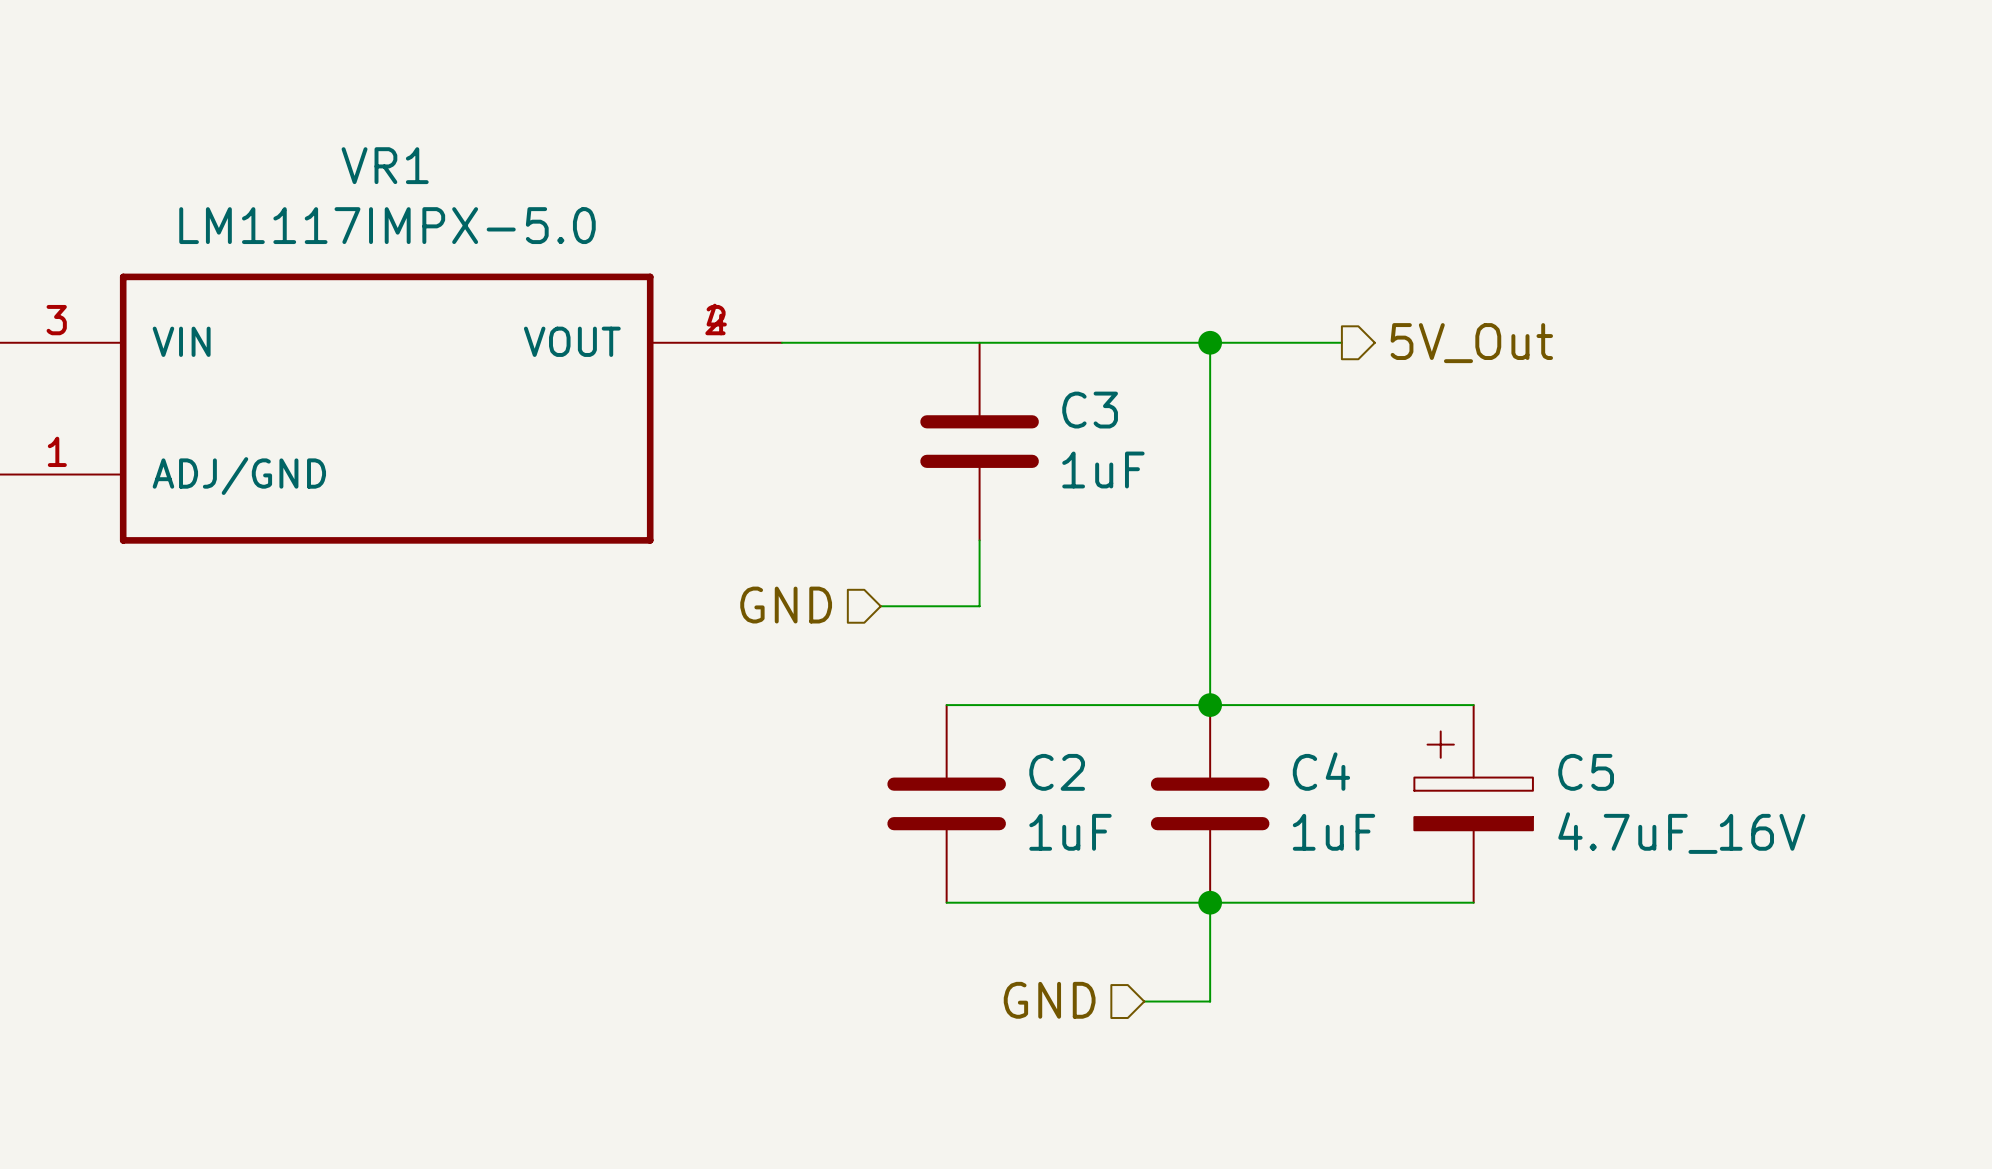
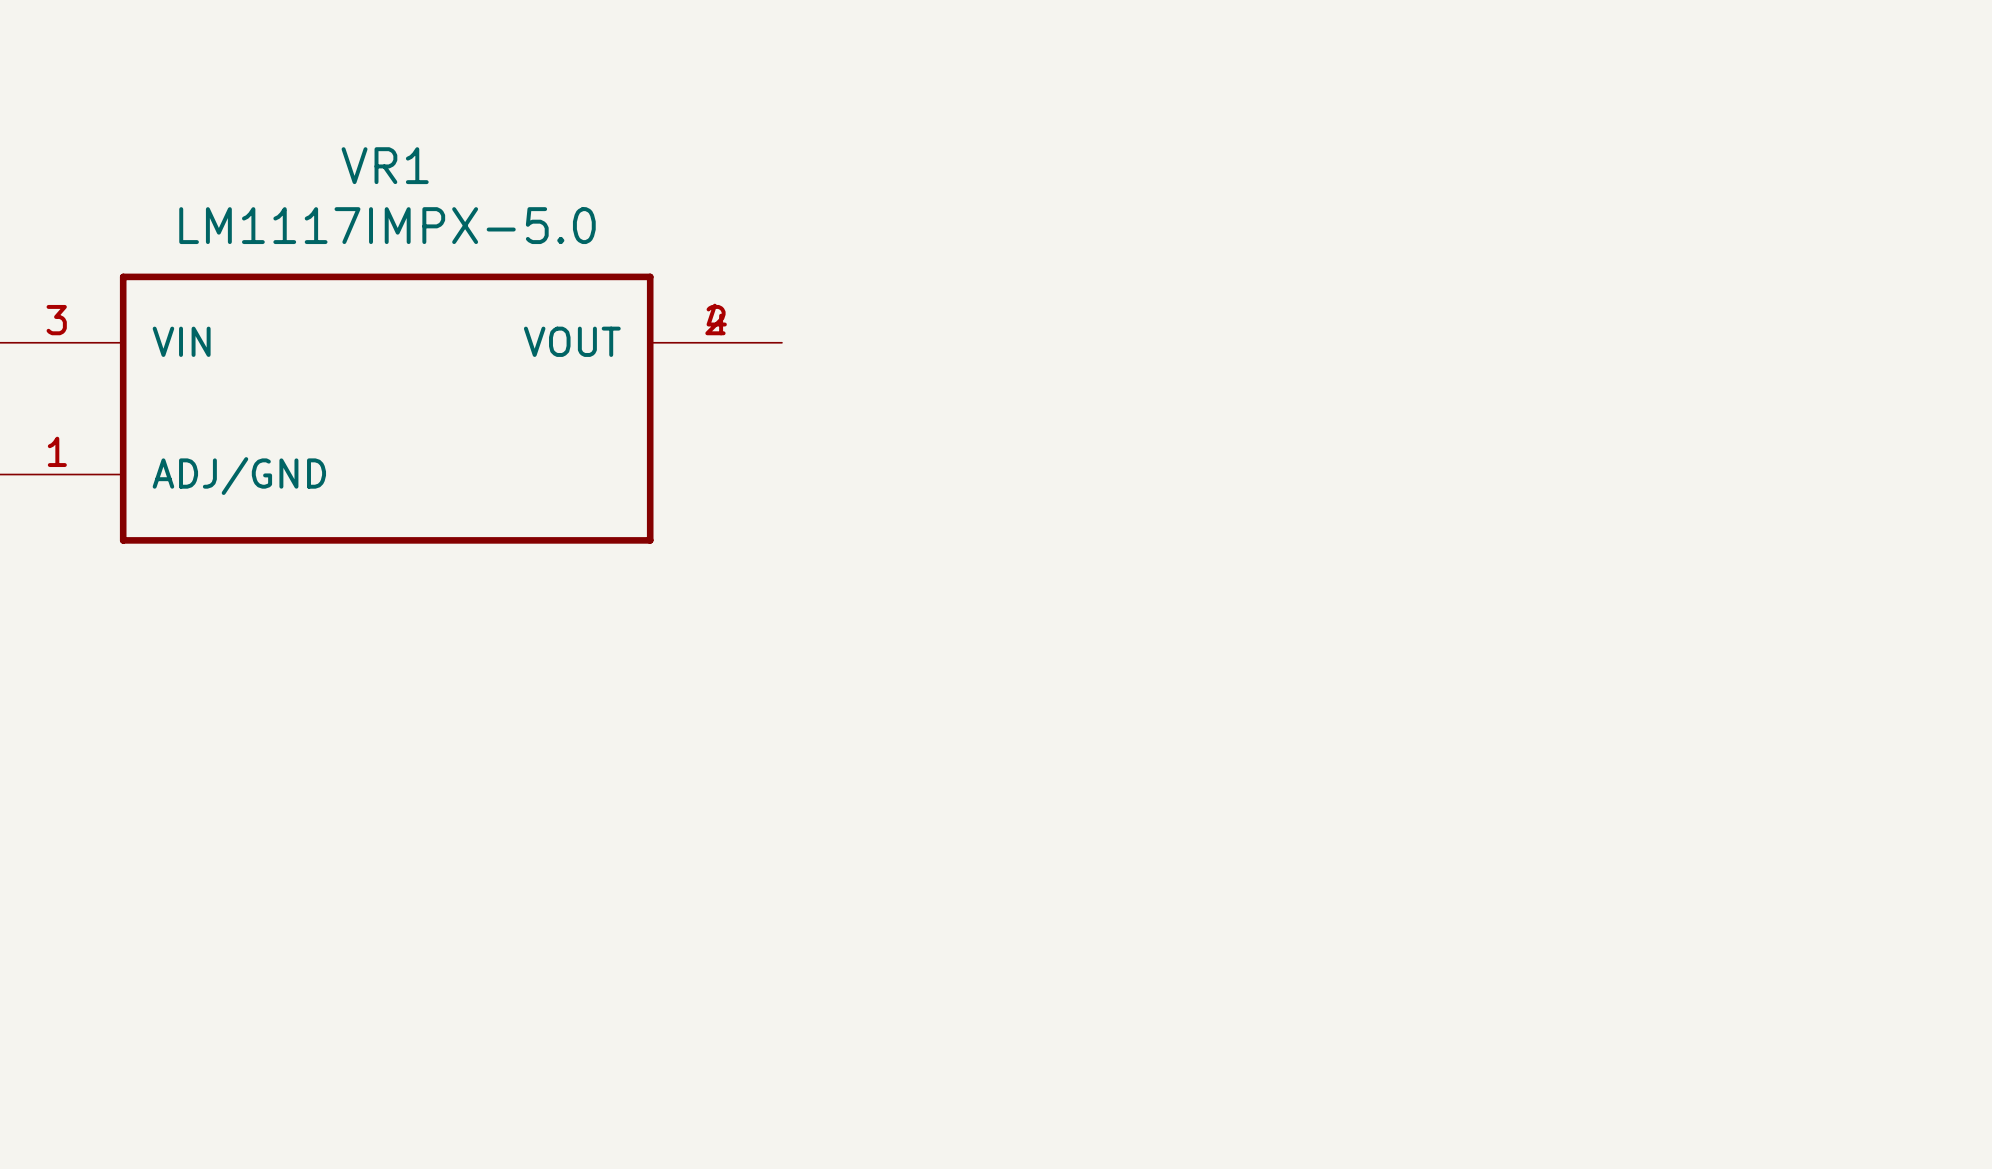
wire: (781, 342) (1341, 342) -> none
wire: (1210, 342) (1210, 705) -> none
junction: (1210, 342) -> none
hierarchical label: 5V_Out (1471, 343) -> none
C3: 1uF (979, 441) -> none
wire: (979, 540) (979, 606) (880, 606) -> none
hierarchical label: GND (786, 605) -> none
wire: (946, 705) (1473, 705) -> none
junction: (1210, 705) -> none
C2: 1uF (946, 803) -> none
C4: 1uF (1210, 803) -> none
C5: 4.7uF_16V (1473, 803) -> none
wire: (946, 902) (1473, 902) -> none
wire: (1210, 902) (1210, 1001) (1144, 1001) -> none
junction: (1210, 902) -> none
hierarchical label: GND (1049, 1000) -> none

